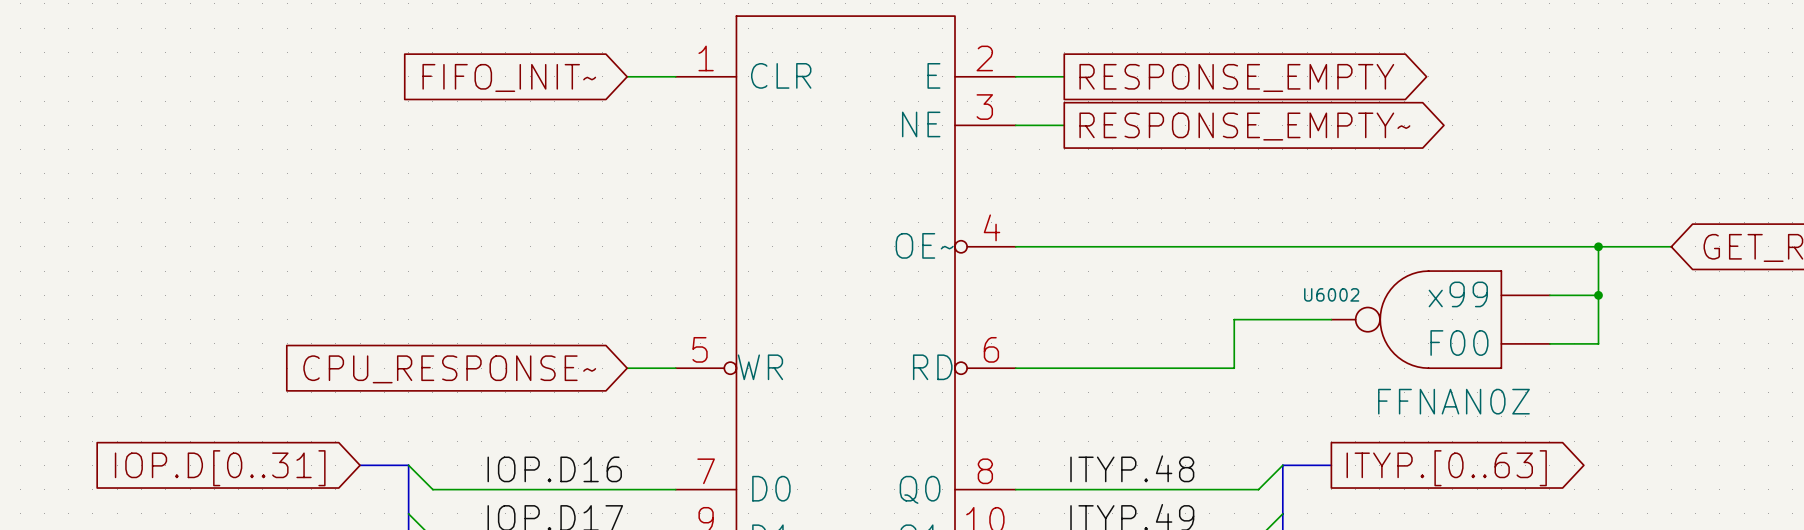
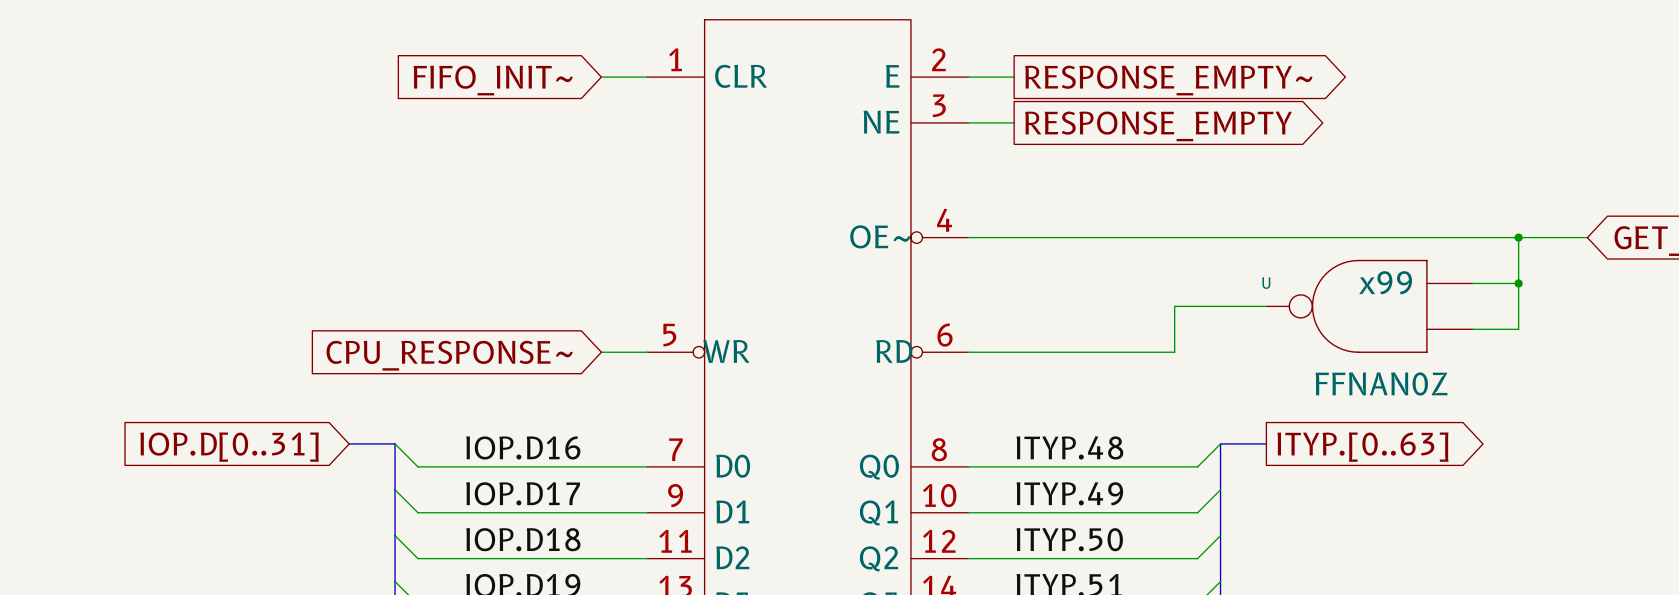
global label: RESPONSE_EMPTY (1236, 77) -> RESPONSE_EMPTY~ (1168, 80)
global label: RESPONSE_EMPTY~ (1244, 126) -> RESPONSE_EMPTY (1158, 126)
U6002 name: U6002 (1331, 294) -> U (1266, 283)
U6002 value: F00 (1459, 343) -> none

